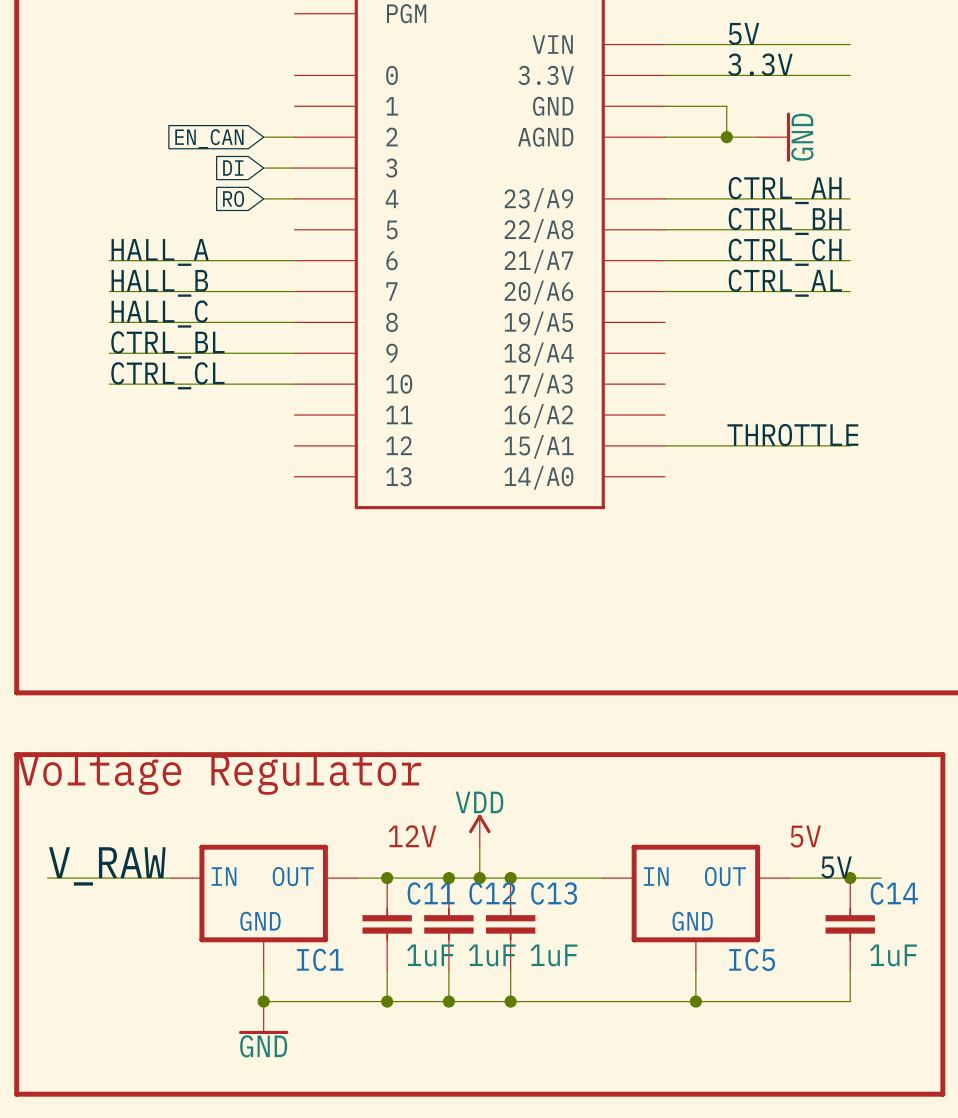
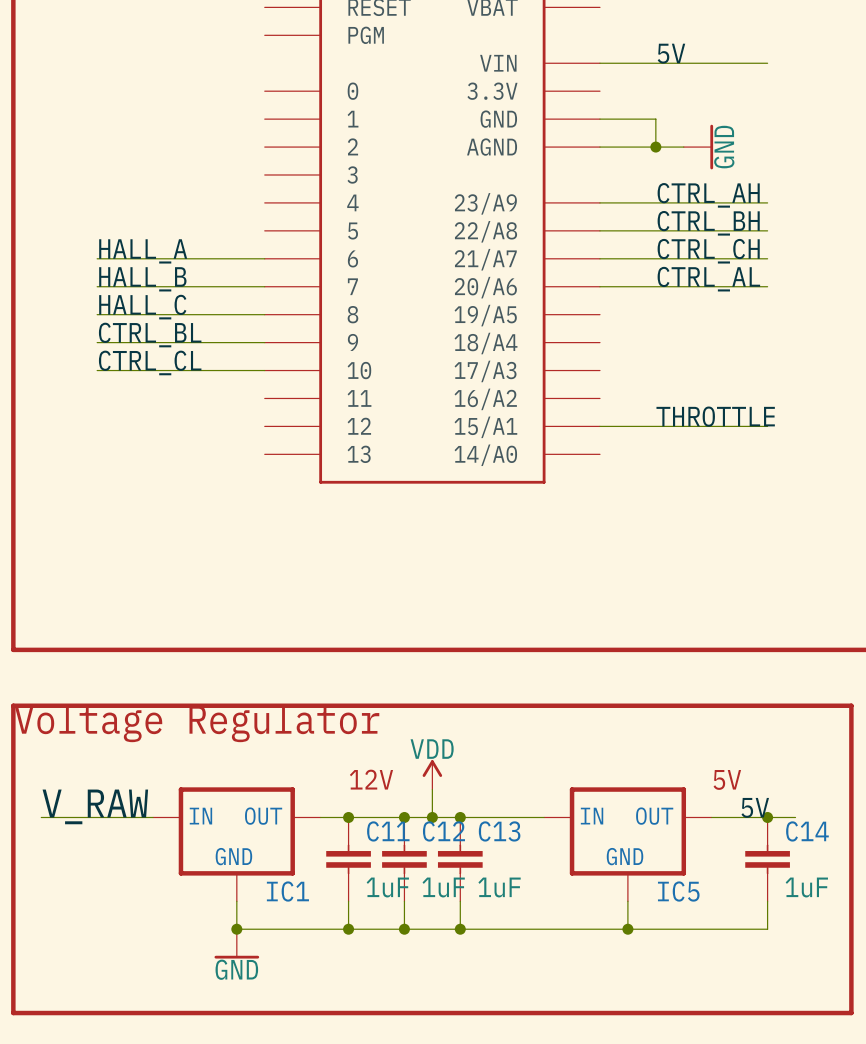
label: 3.3V (760, 64) -> none
wire: (665, 75) (850, 75) -> none
wire: (263, 137) (294, 137) -> none
global label: EN_CAN (209, 138) -> none
global label: DI (233, 168) -> none
wire: (263, 168) (294, 168) -> none
global label: RO (233, 198) -> none
wire: (263, 198) (294, 198) -> none

